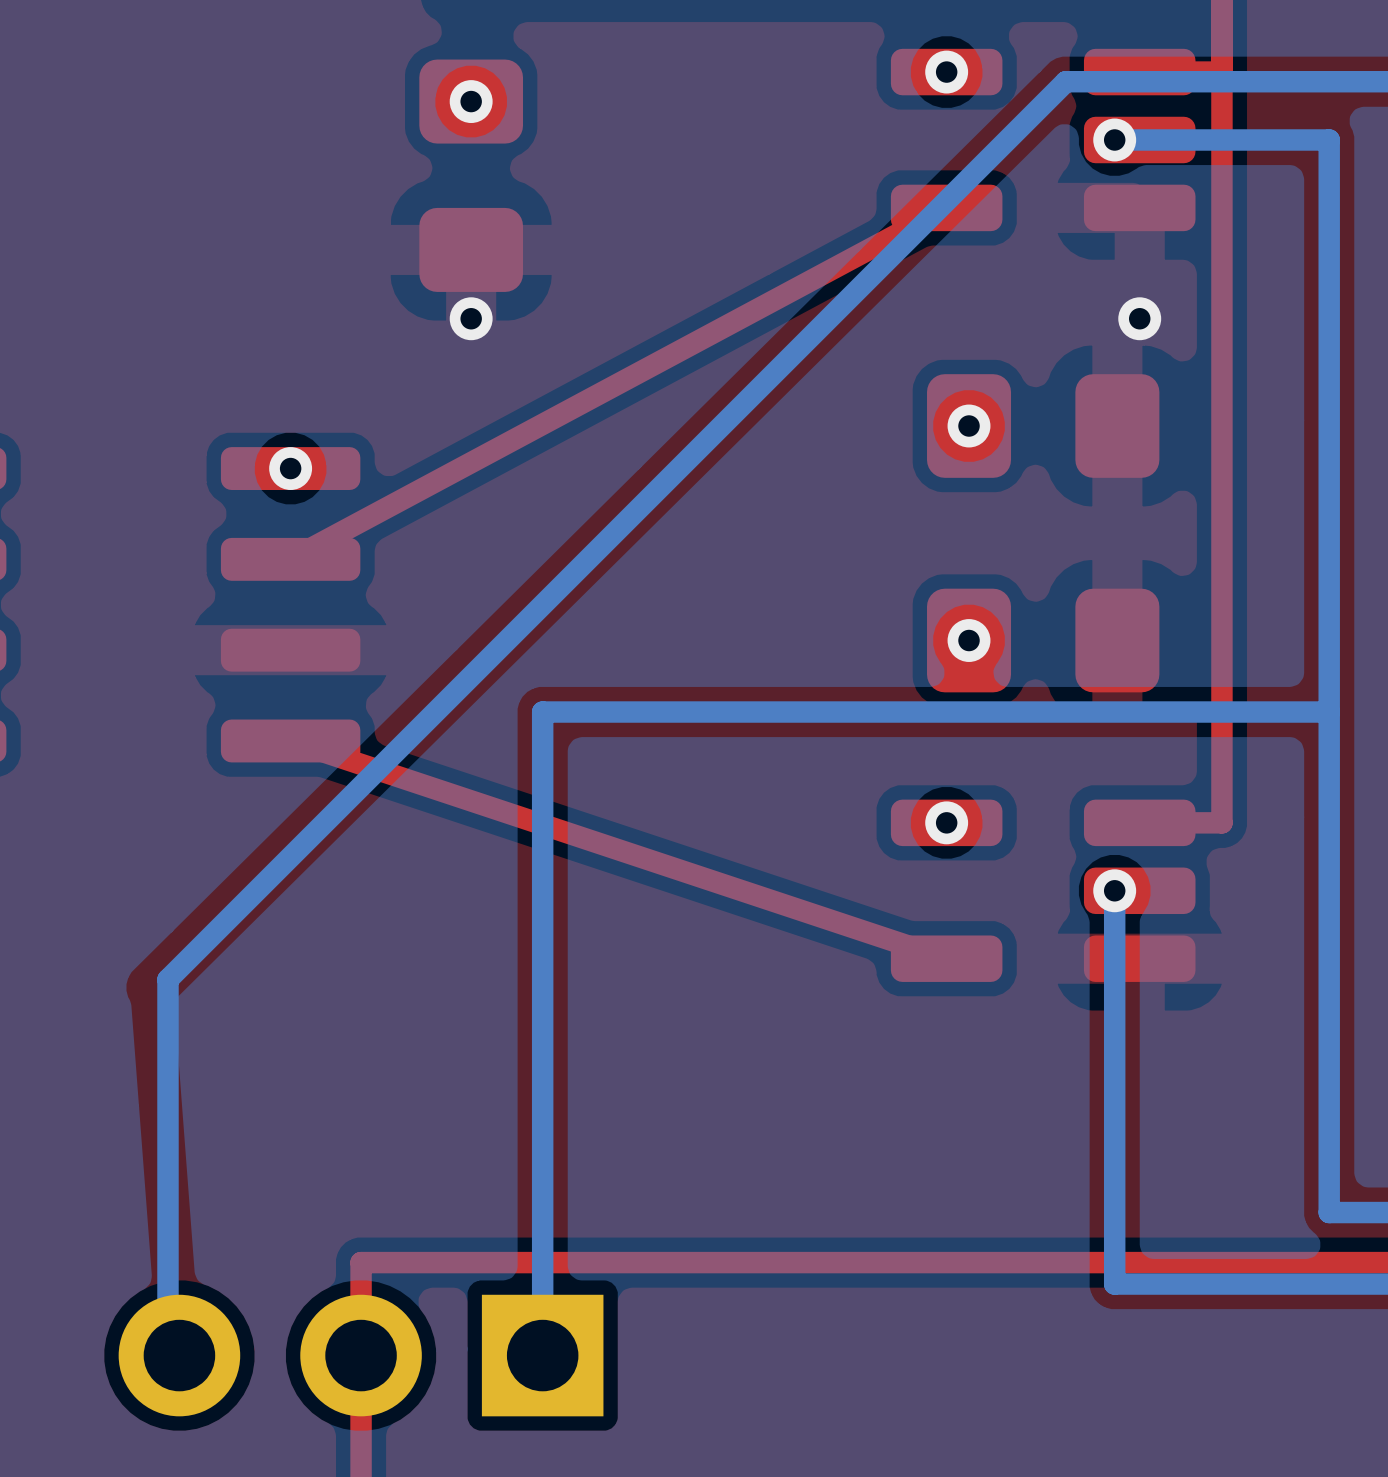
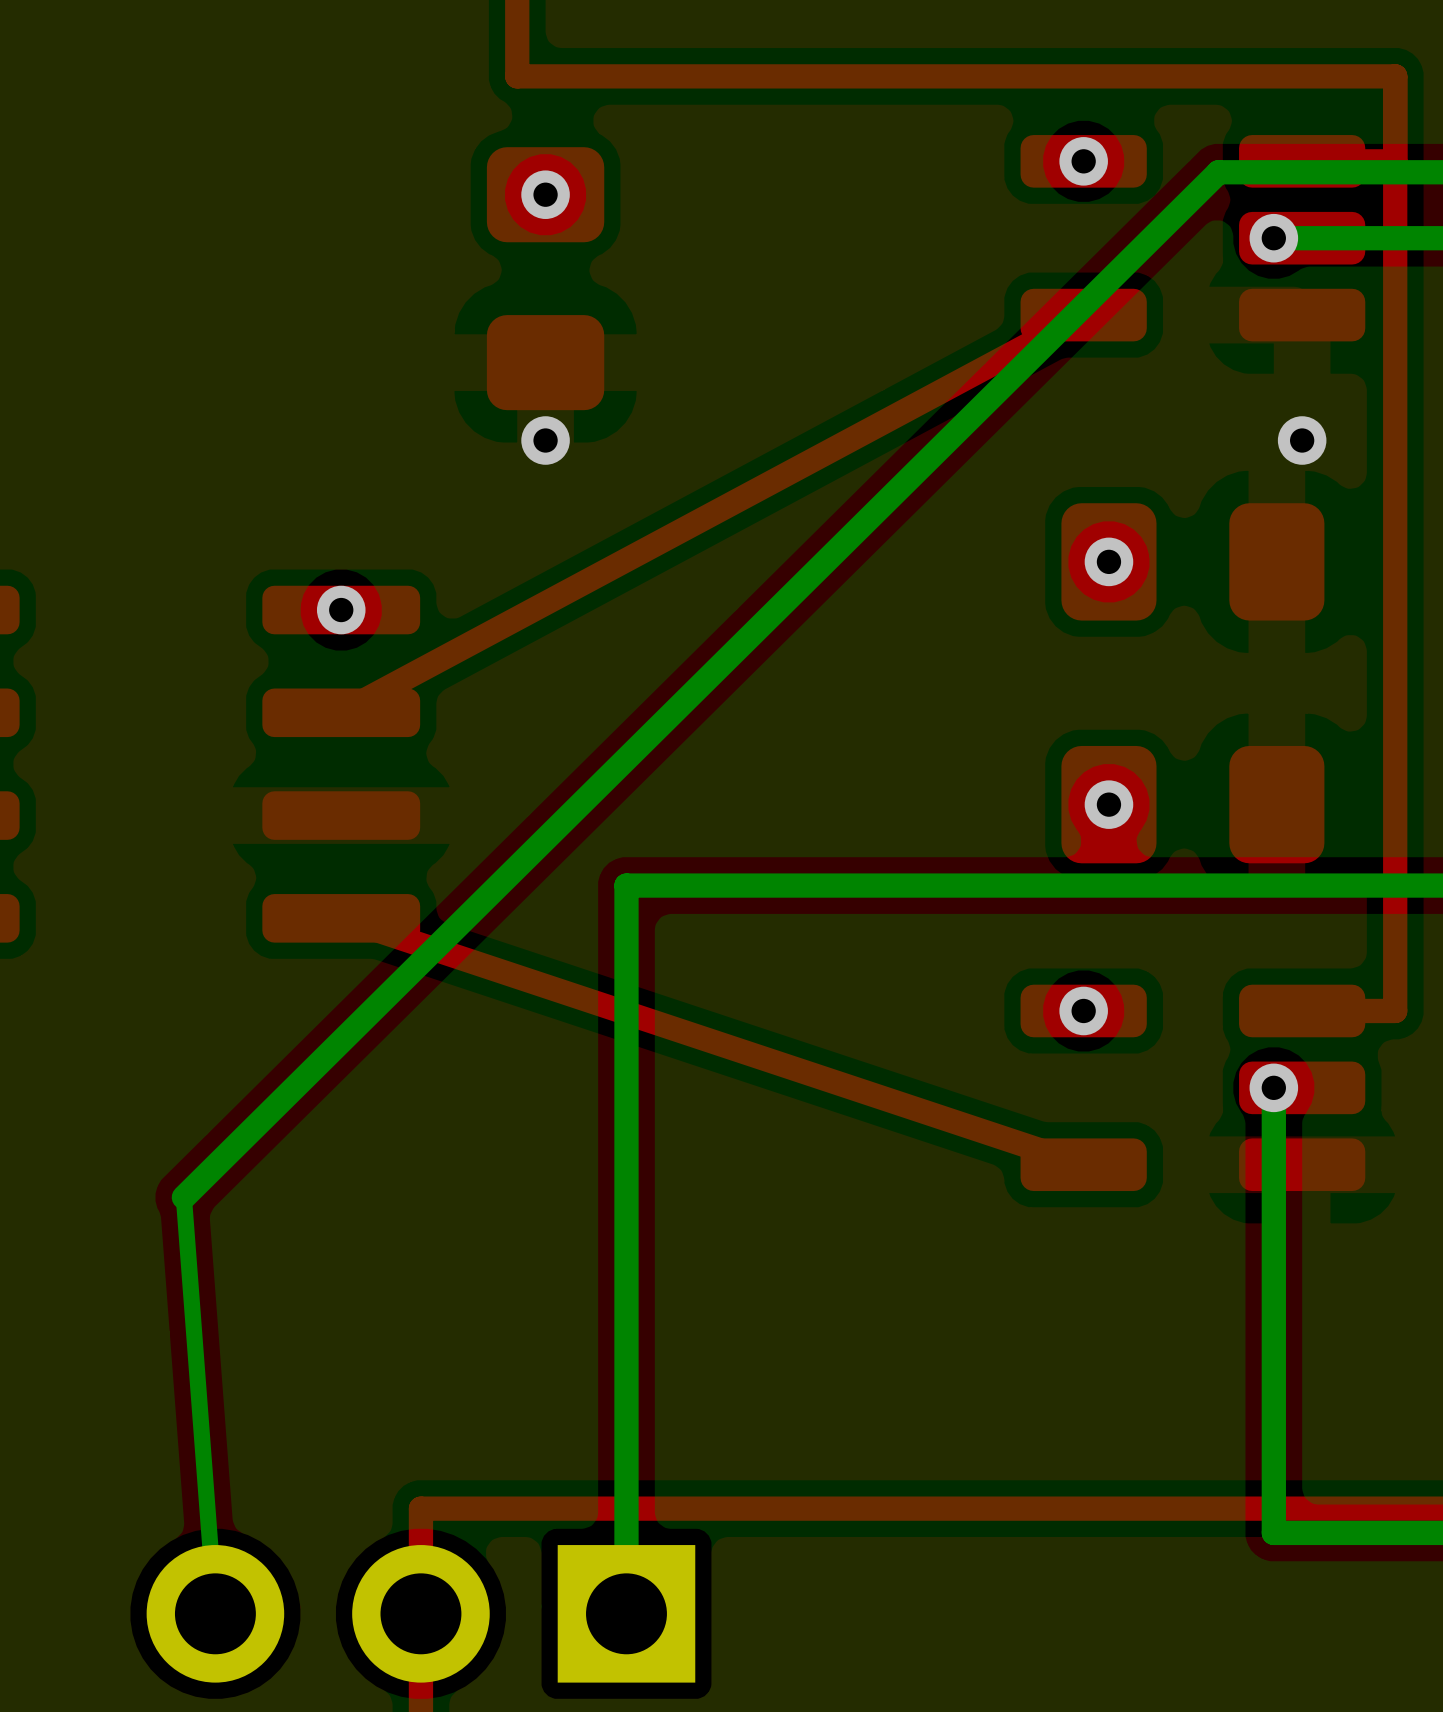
bottom track: (1065, 81) (167, 979) (167, 1344) (179, 1355) -> (1218, 172) (183, 1197) (215, 1613)

